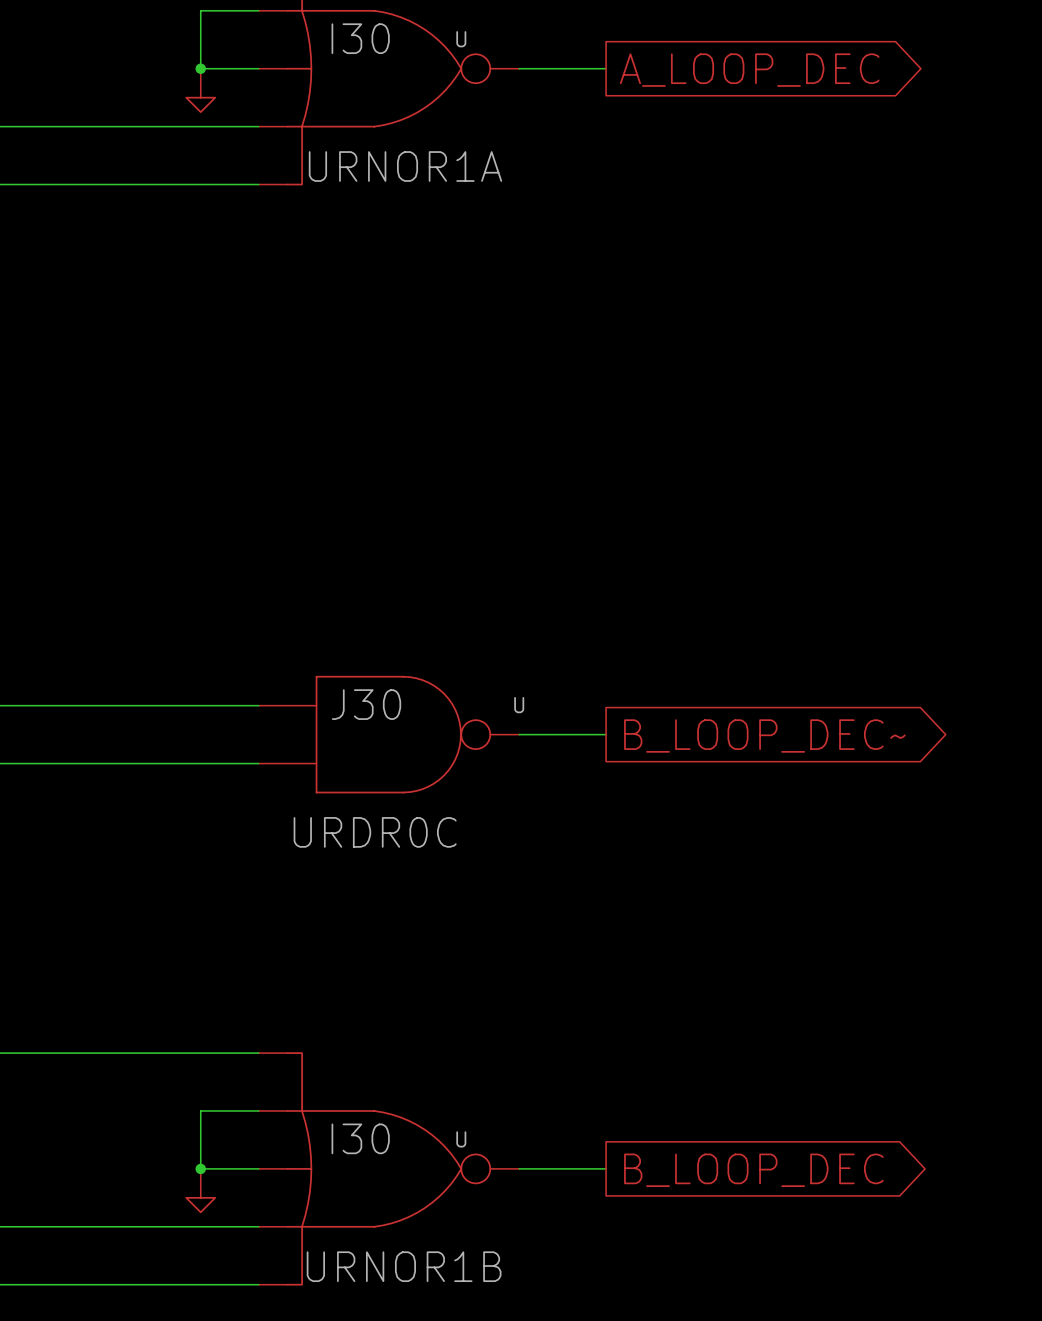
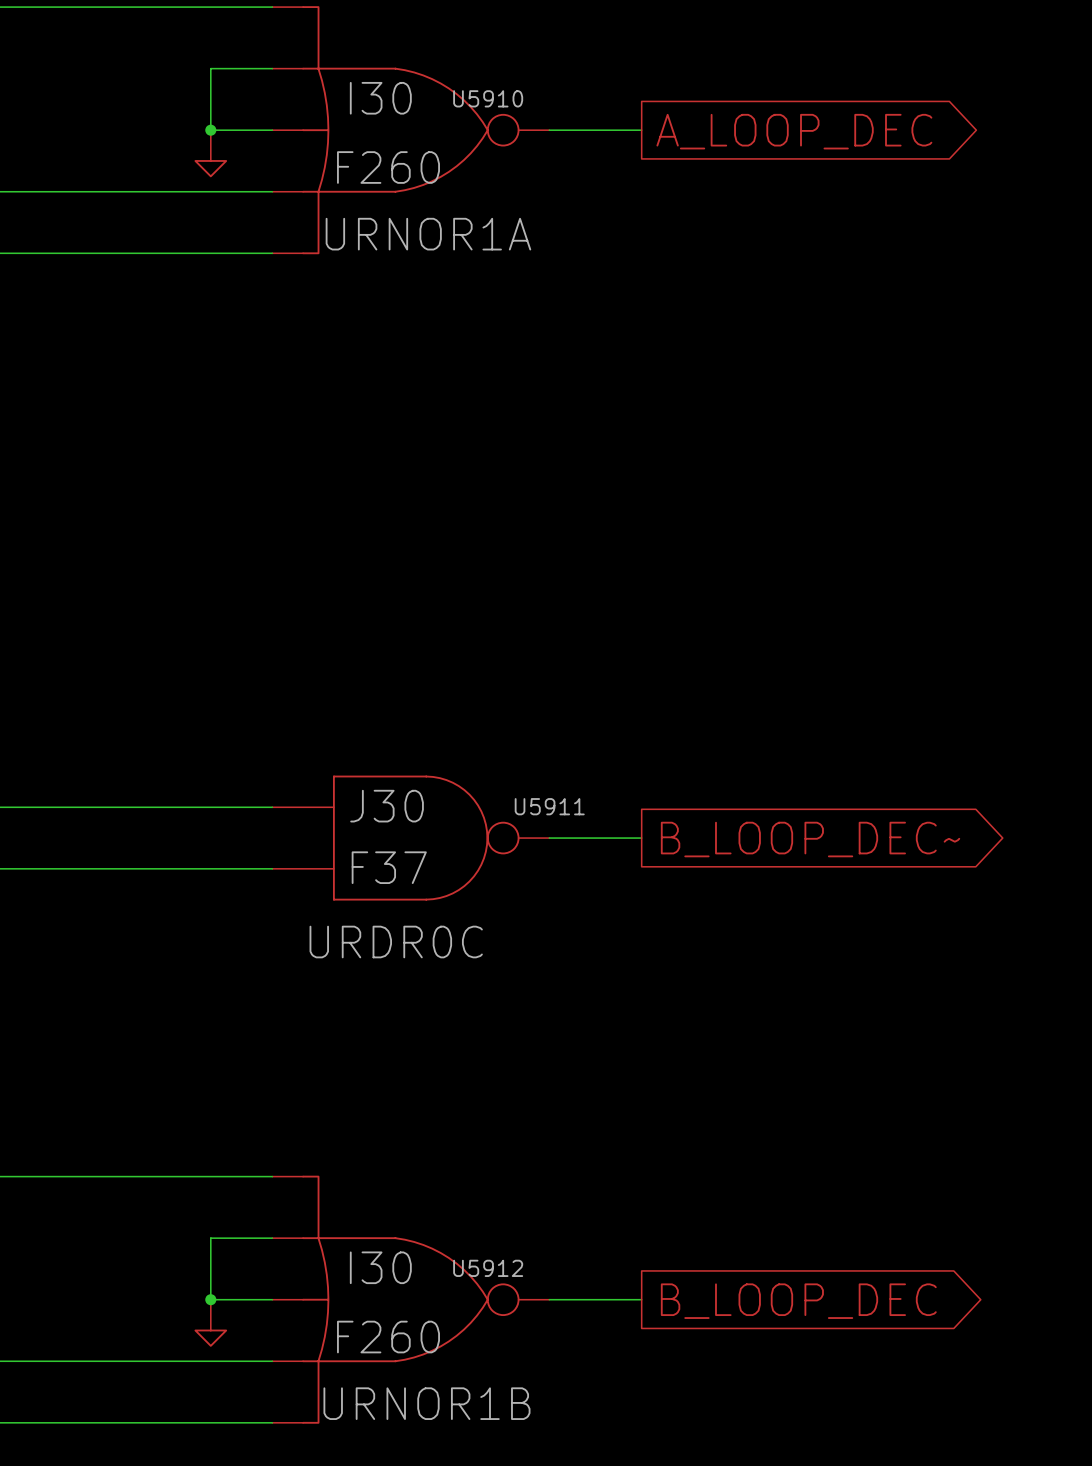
U name: U (461, 39) -> U5910 (488, 98)
U value: none -> F260 (388, 167)
U name: U (519, 705) -> U5911 (549, 806)
U value: none -> F37 (389, 867)
U name: U (461, 1139) -> U5912 (488, 1268)
U value: none -> F260 (388, 1337)

